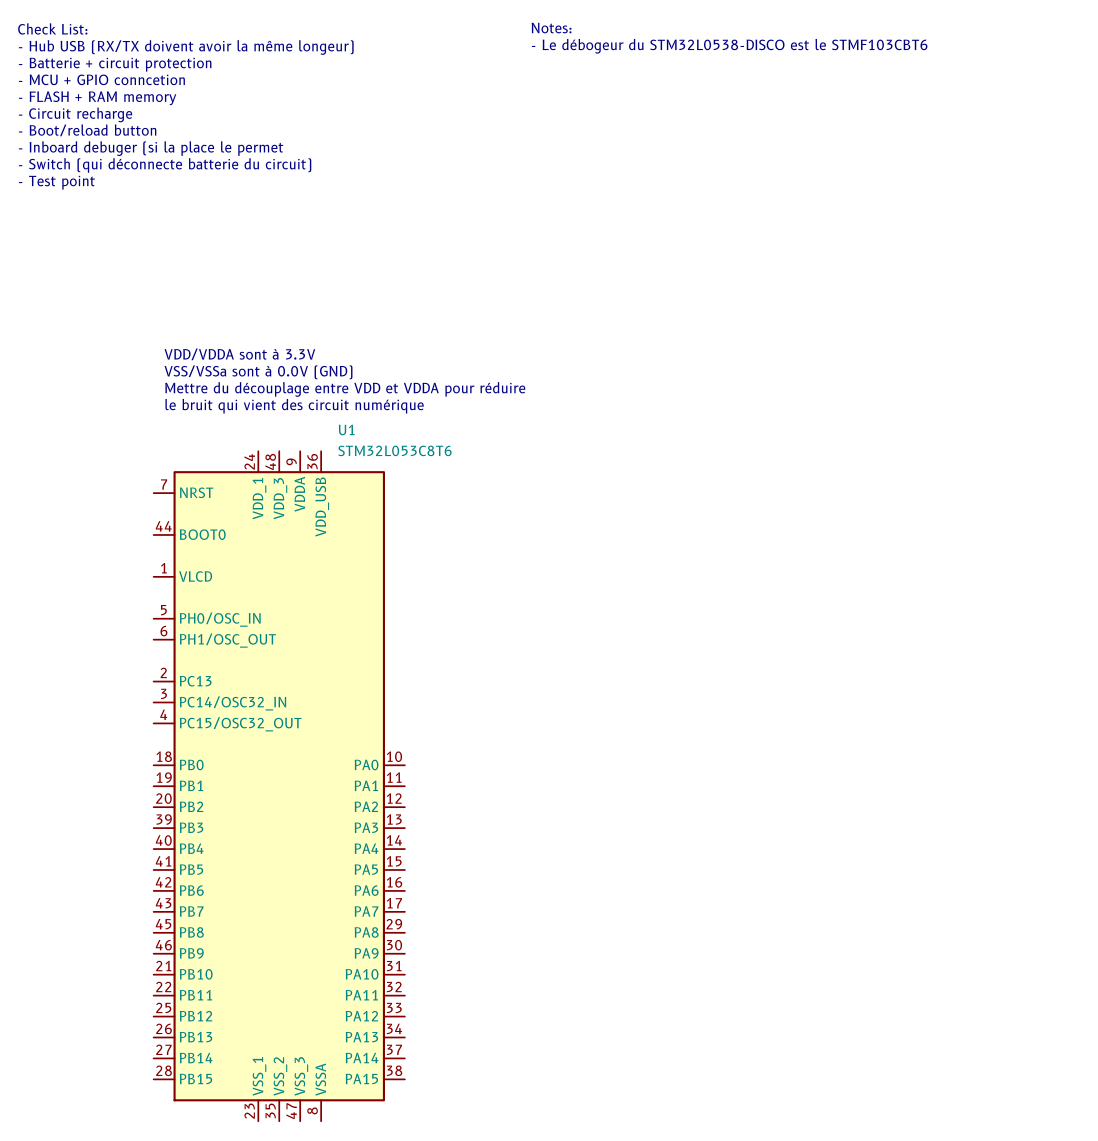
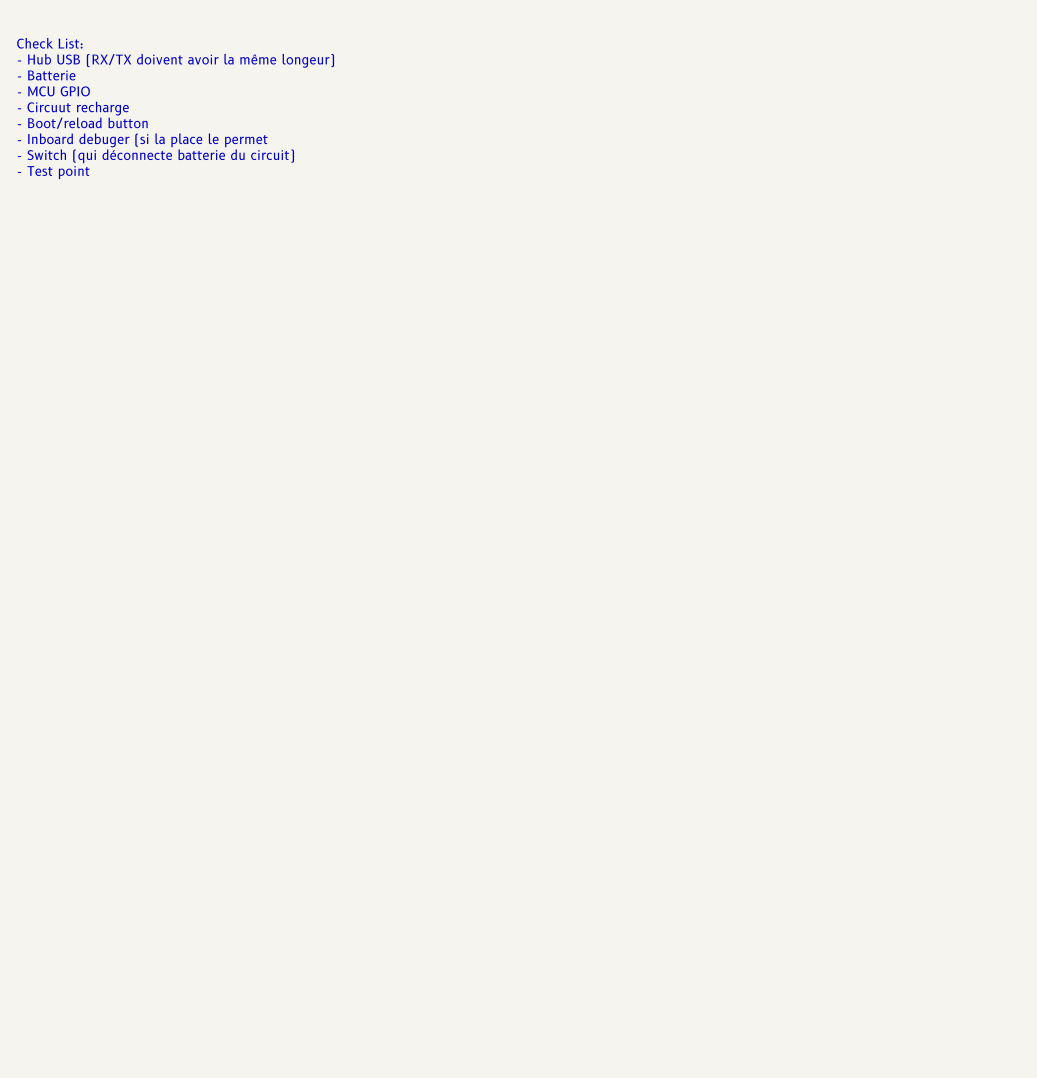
text: Check List: (52, 28) -> none
text: Notes: (551, 28) -> none
text: - Le débogeur du STM32L0538-DISCO est le STMF103CBT6 (729, 46) -> none
text: - Hub USB (RX/TX doivent avoir la même longeur) (186, 47) -> Check List: (49, 43)
text: - Batterie + circuit protection (115, 64) -> - Hub USB (RX/TX doivent avoir la même longeur) (175, 60)
text: - MCU + GPIO conncetion (101, 79) -> - Batterie (46, 75)
text: - FLASH + RAM memory (97, 98) -> - MCU GPIO (53, 91)
text: - Circuit recharge (75, 114) -> - Circuut recharge (73, 108)
text: VDD/VDDA sont à 3.3V (239, 354) -> none
text: VSS/VSSa sont à 0.0V (GND) (258, 372) -> none
text: Mettre du découplage entre VDD et VDDA pour réduire (345, 389) -> none
text: le bruit qui vient des circuit numérique (294, 406) -> none
U1: STM32L053C8T6 (279, 786) -> none

